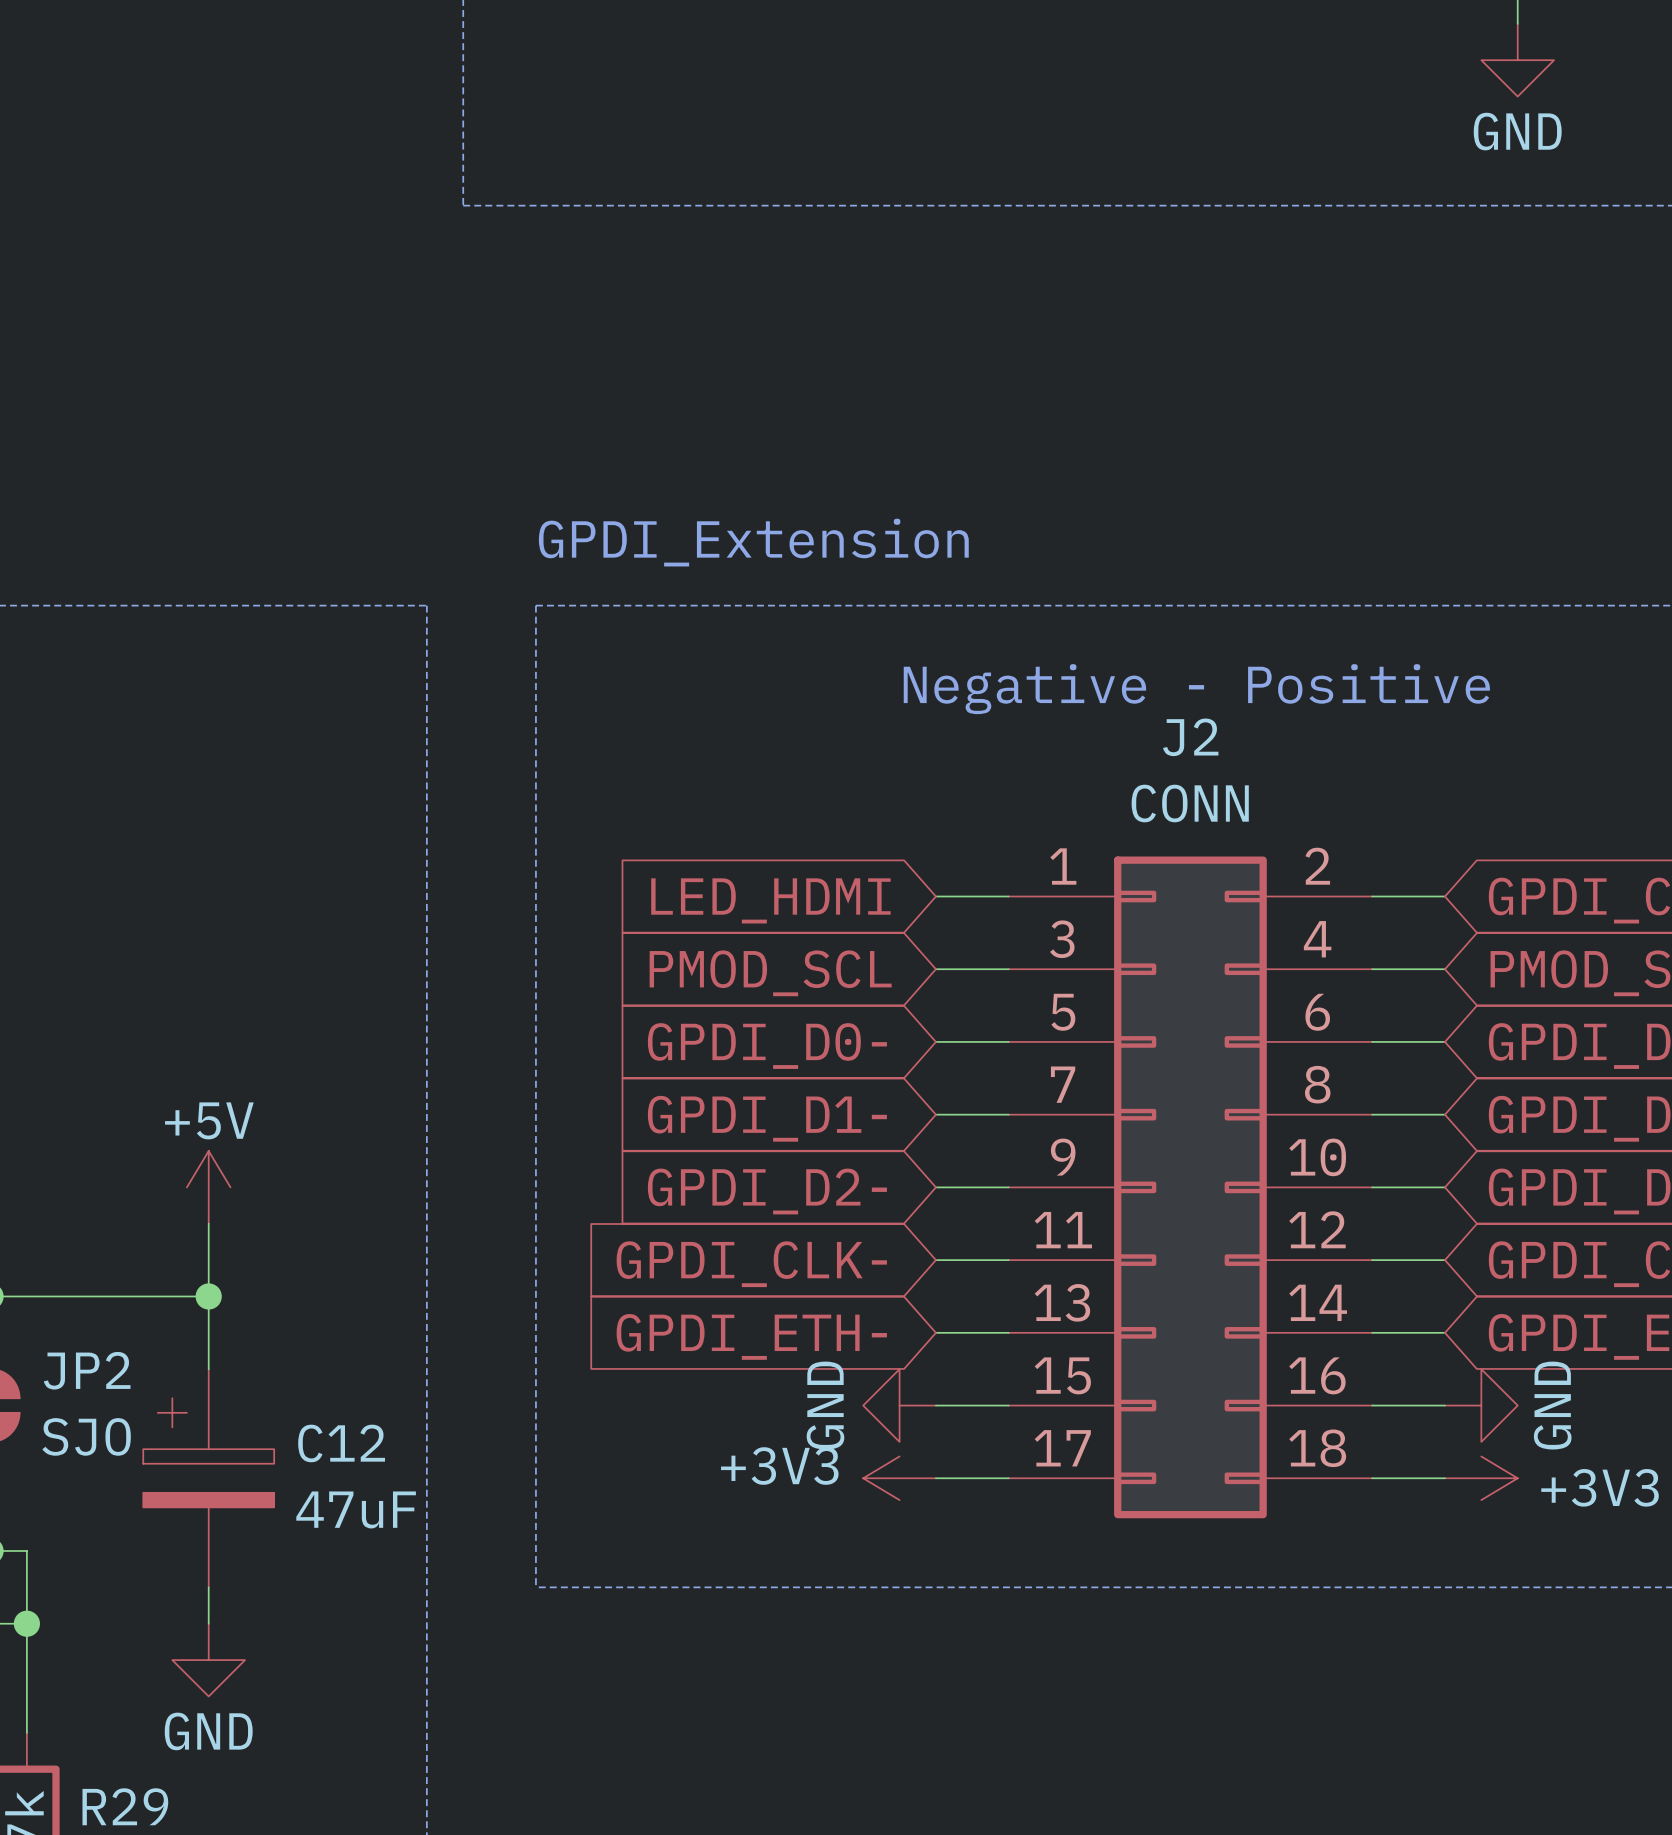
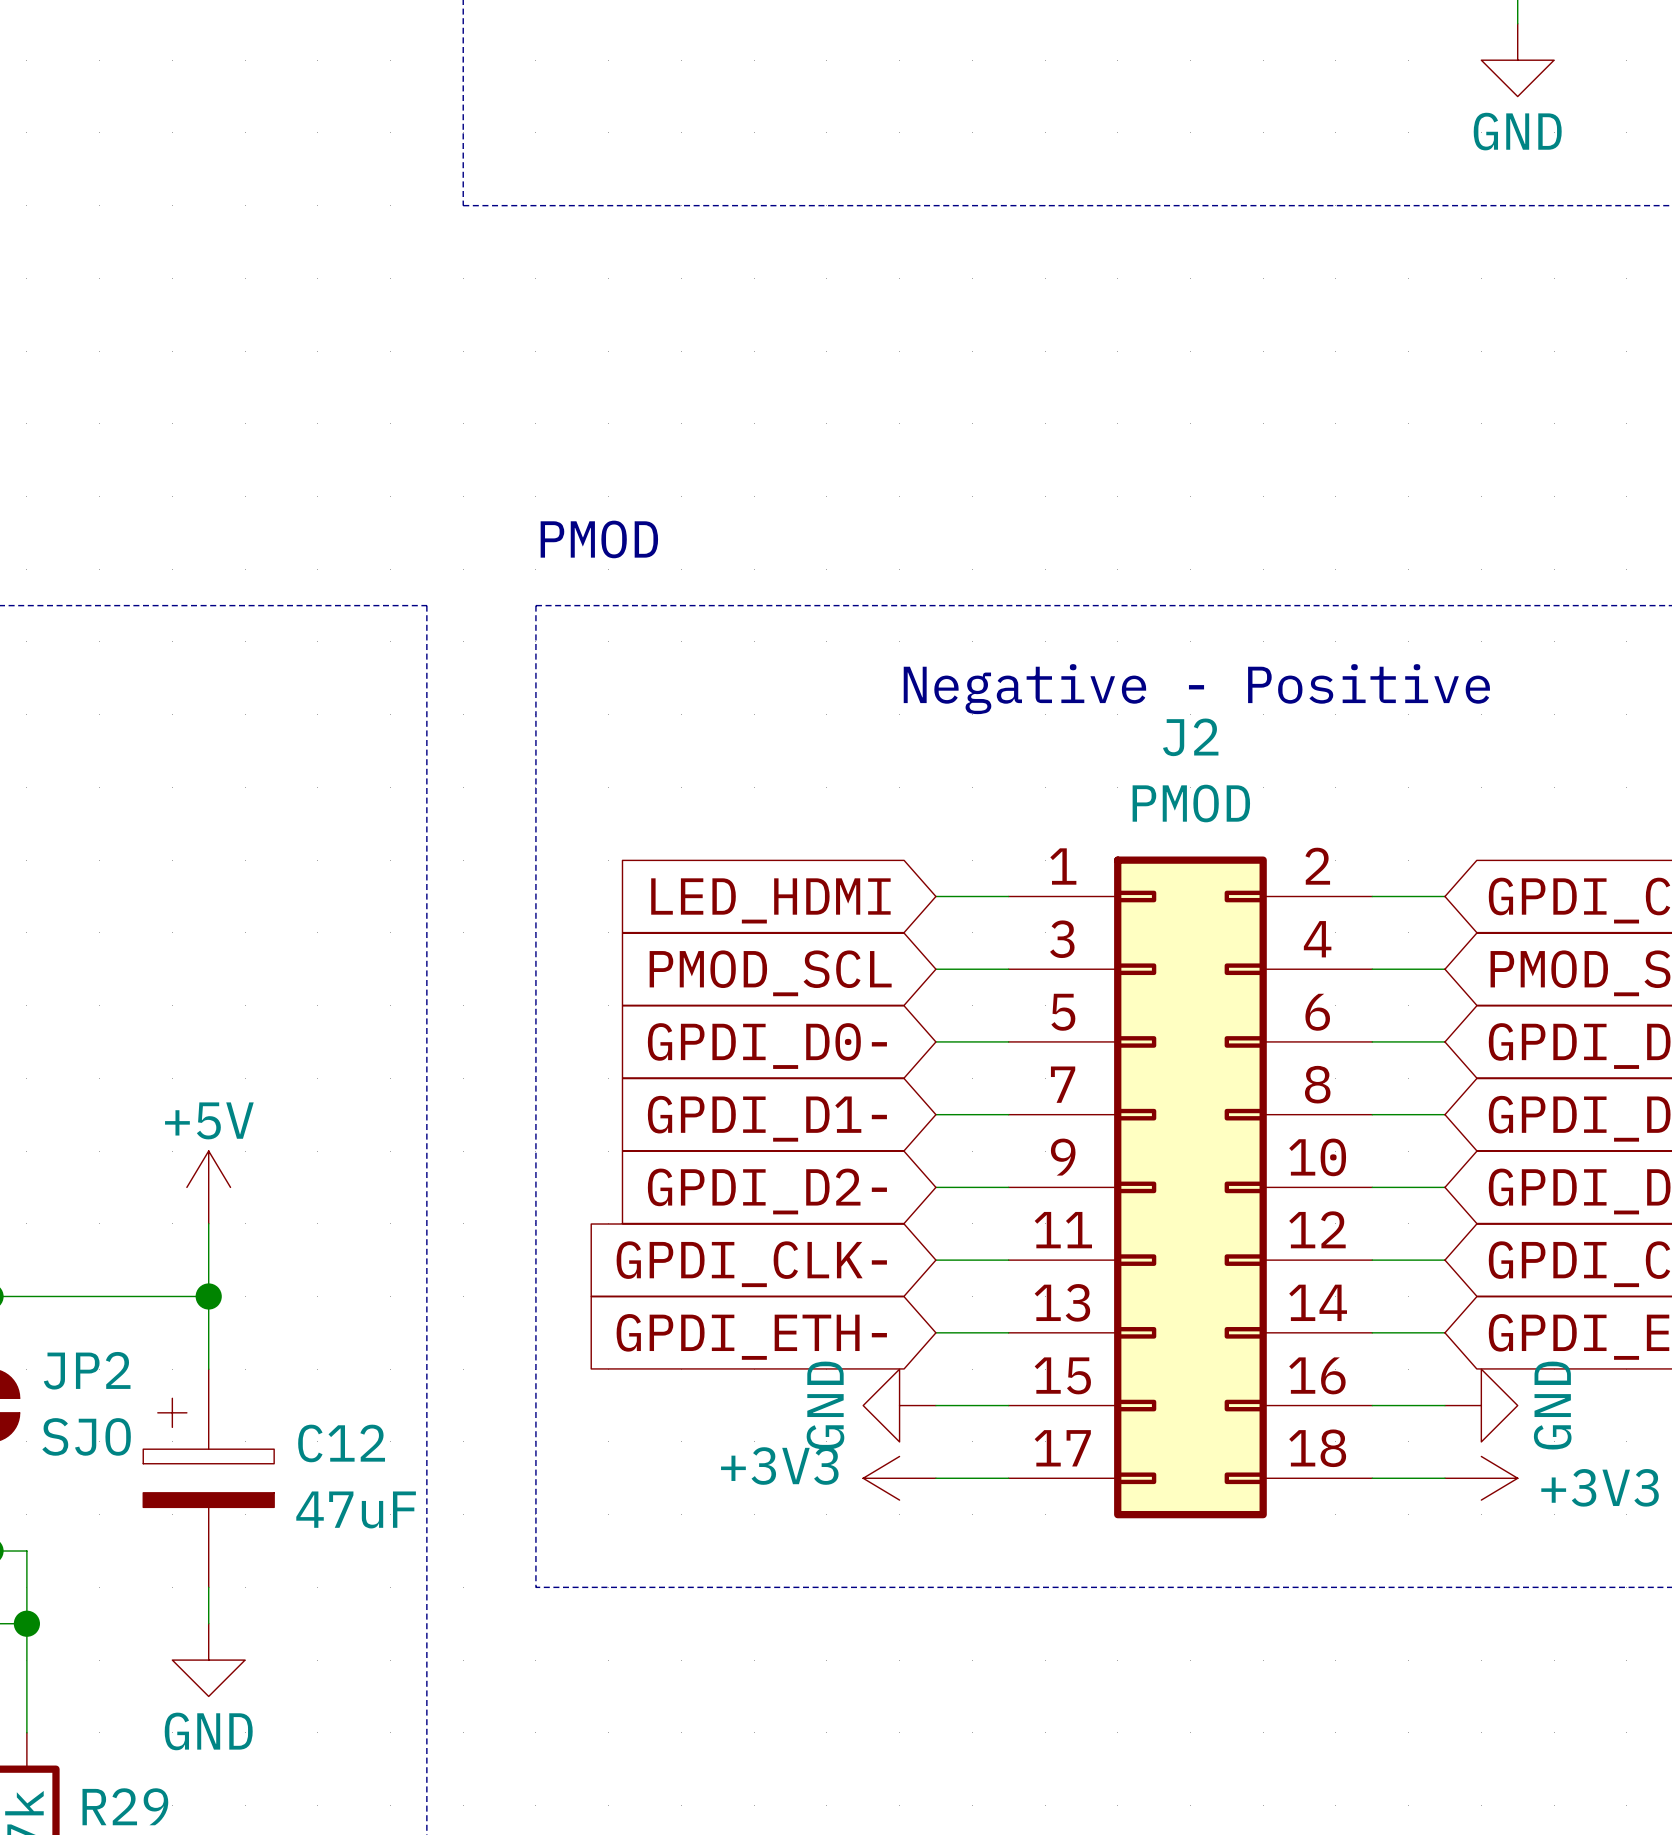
text: GPDI_Extension (753, 542) -> PMOD (599, 539)
J2 value: CONN (1190, 803) -> PMOD (1191, 803)

